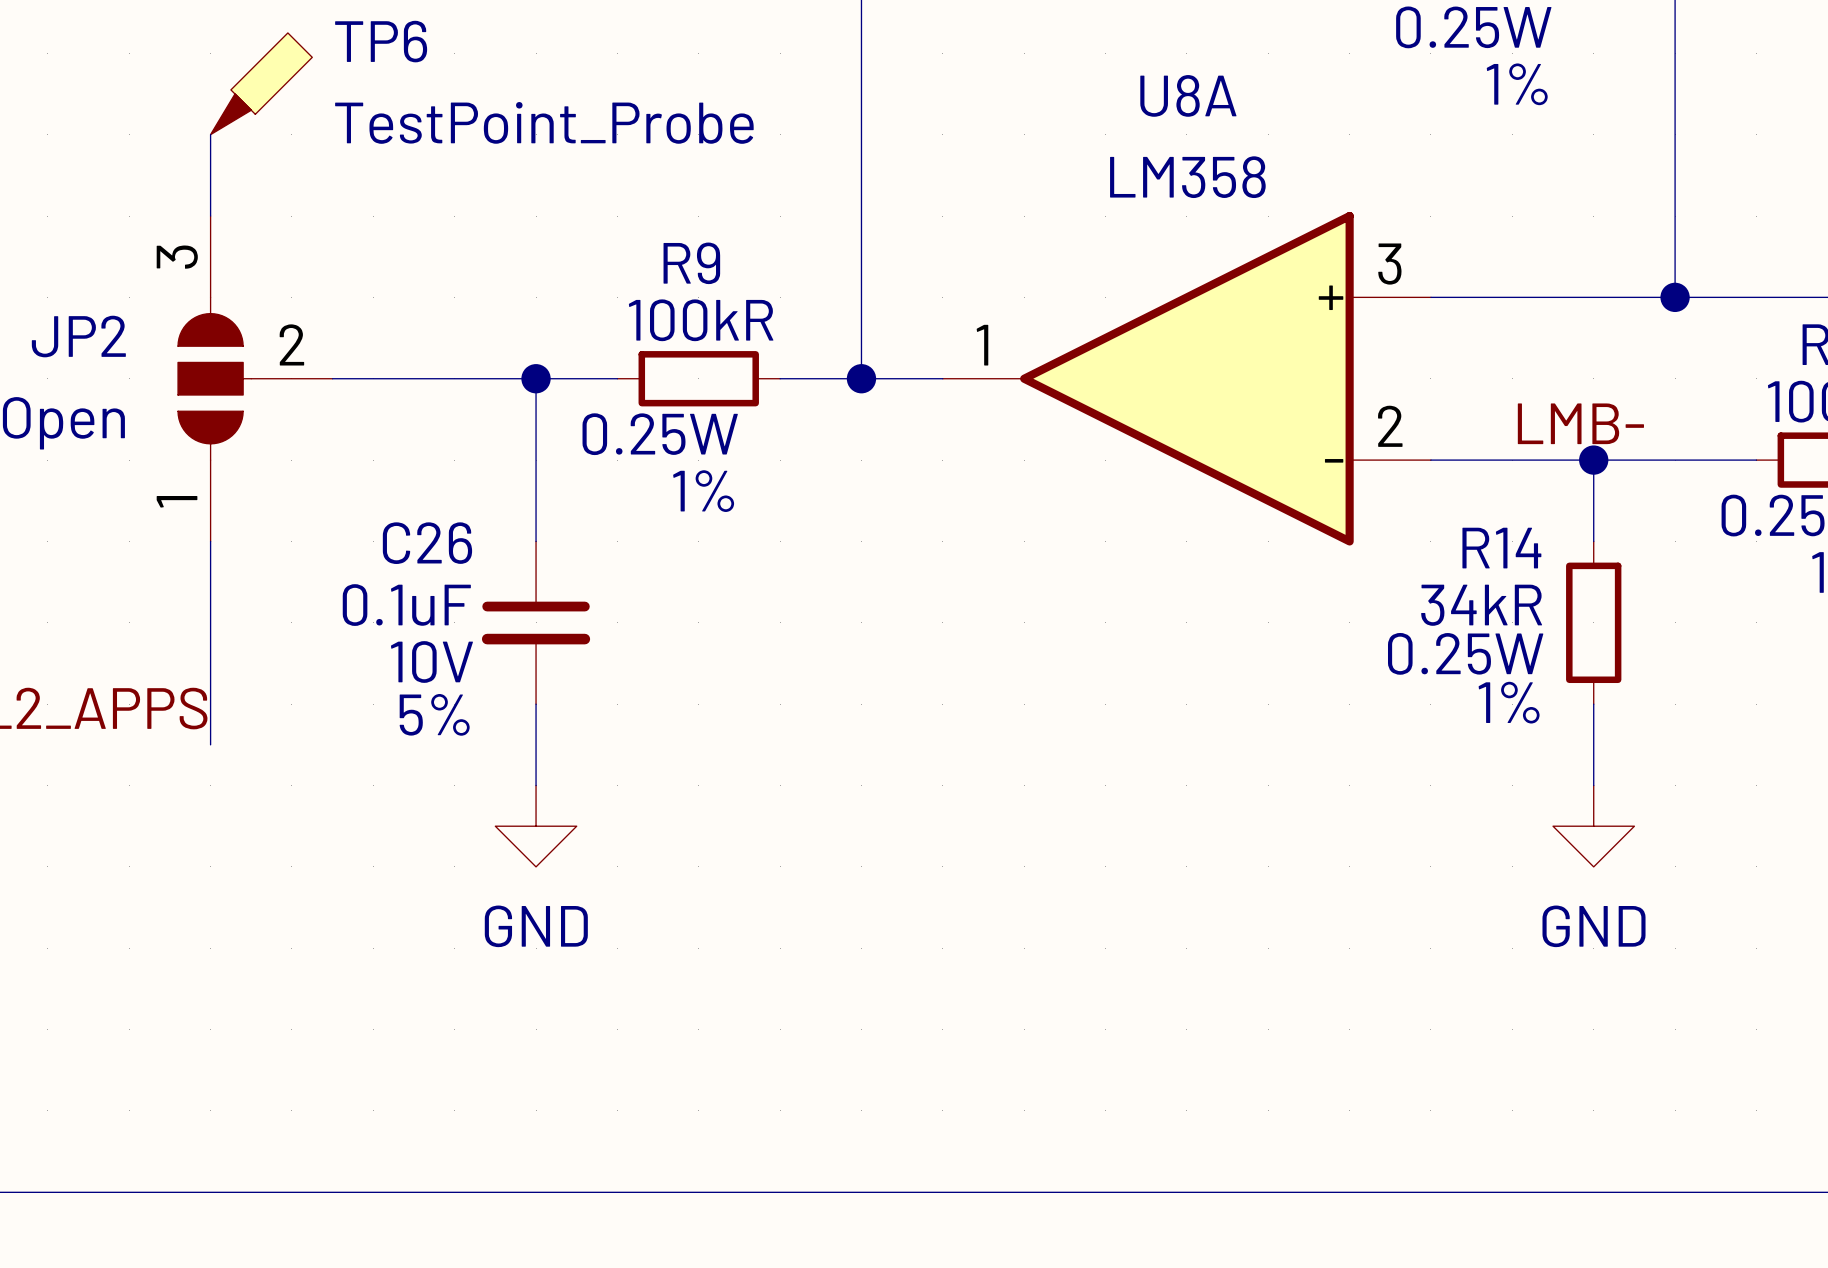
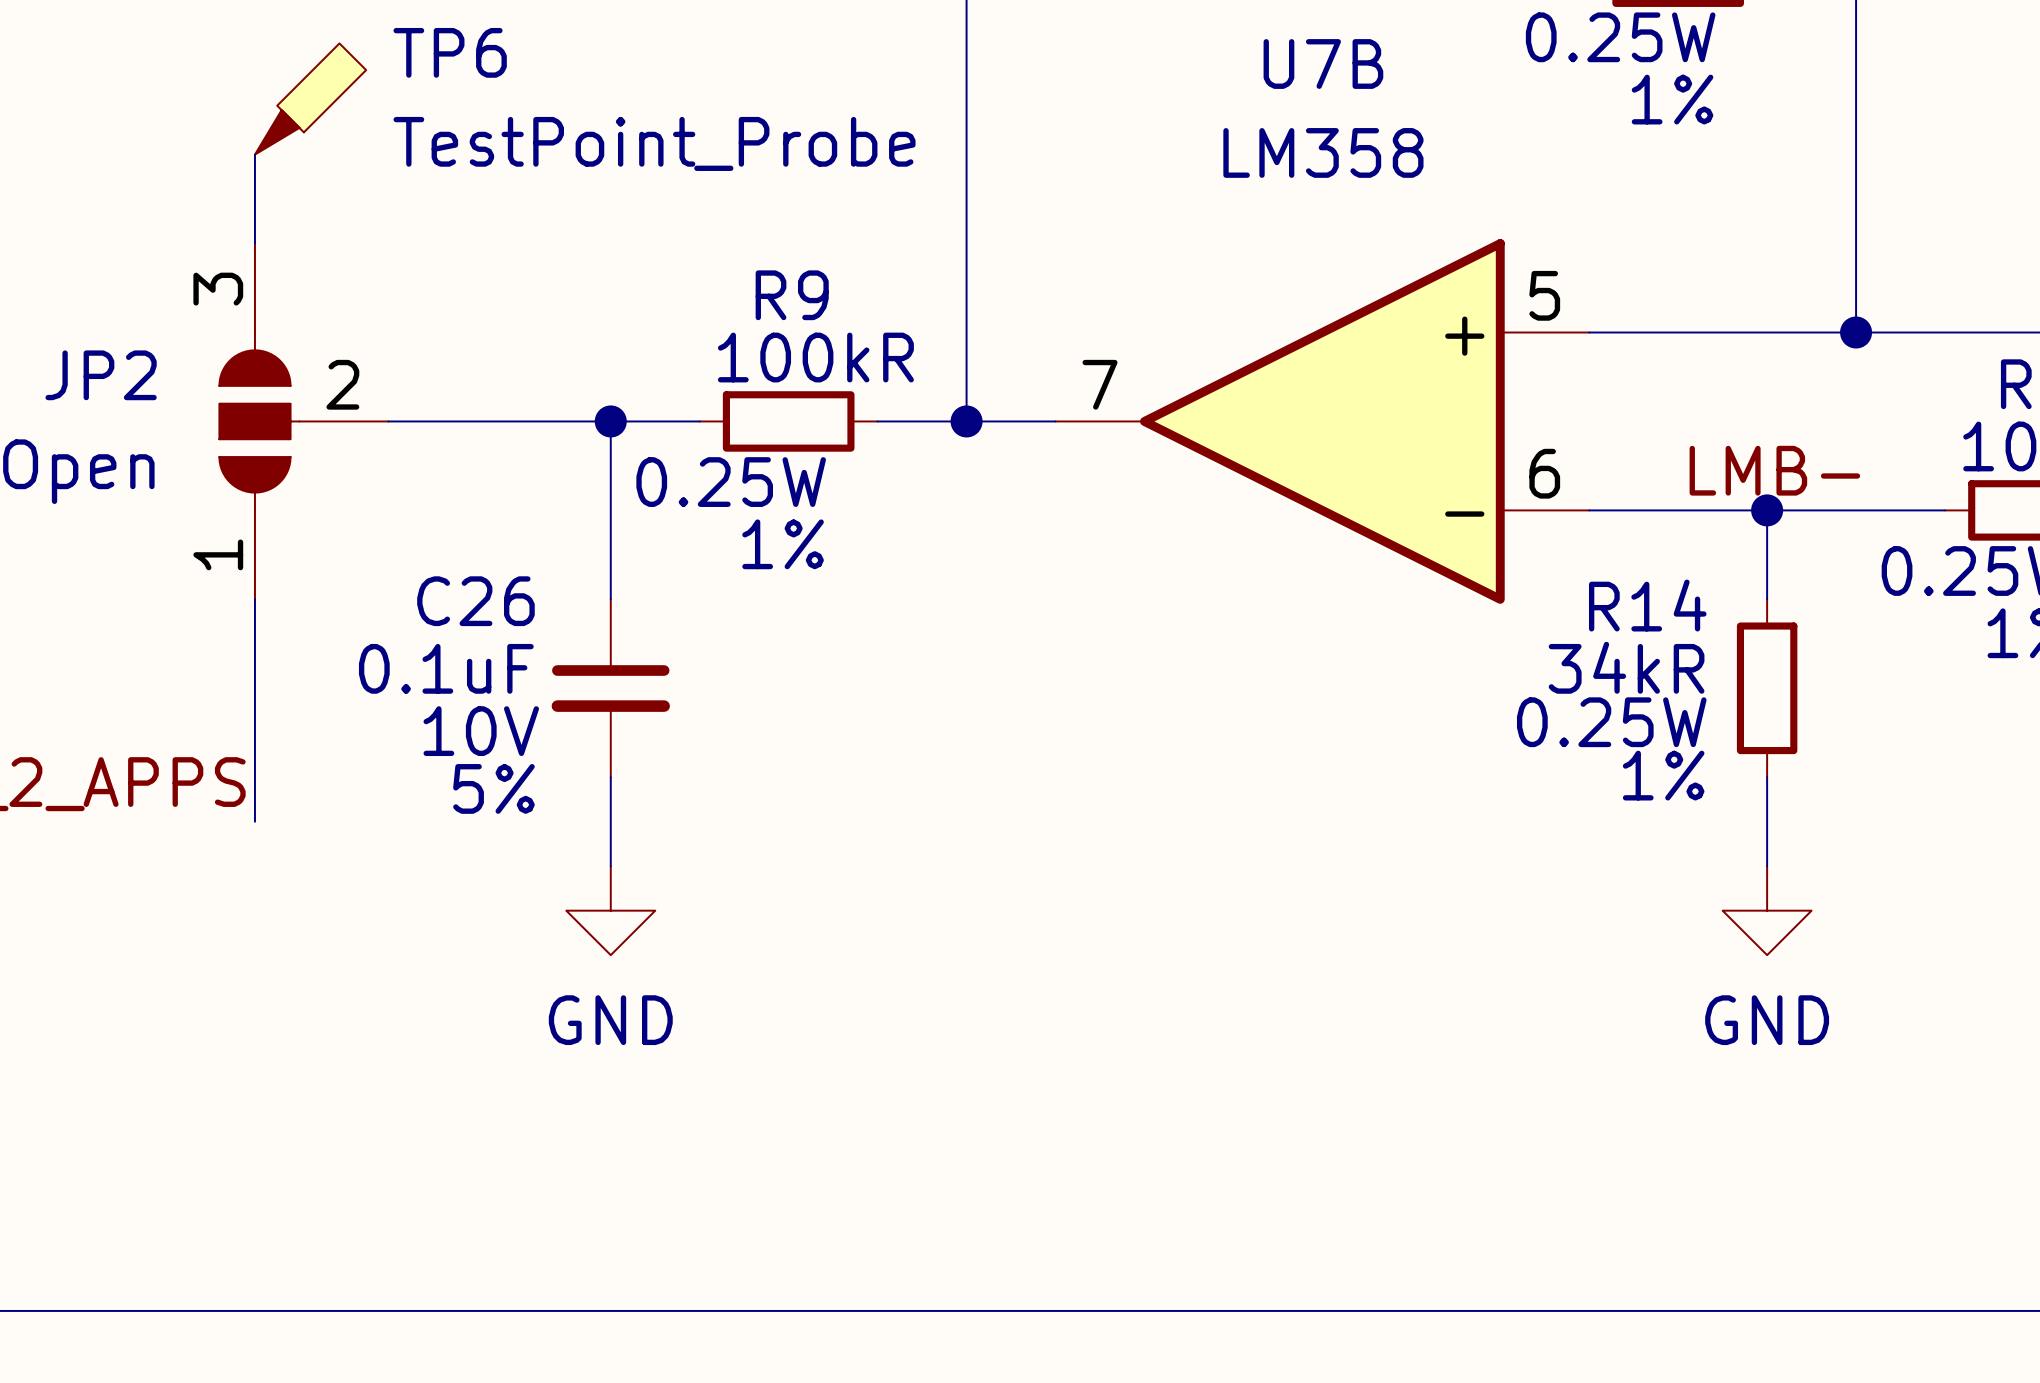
U8A name: U8A (1188, 95) -> U7B (1323, 63)
U8A value position: LM358 (1187, 177) -> LM358 (1323, 152)
U8A pin number: 3 (1389, 264) -> 5 (1544, 295)
U8A pin number: 1 (982, 345) -> 7 (1100, 384)
U8A pin number: 2 (1390, 426) -> 6 (1544, 473)

